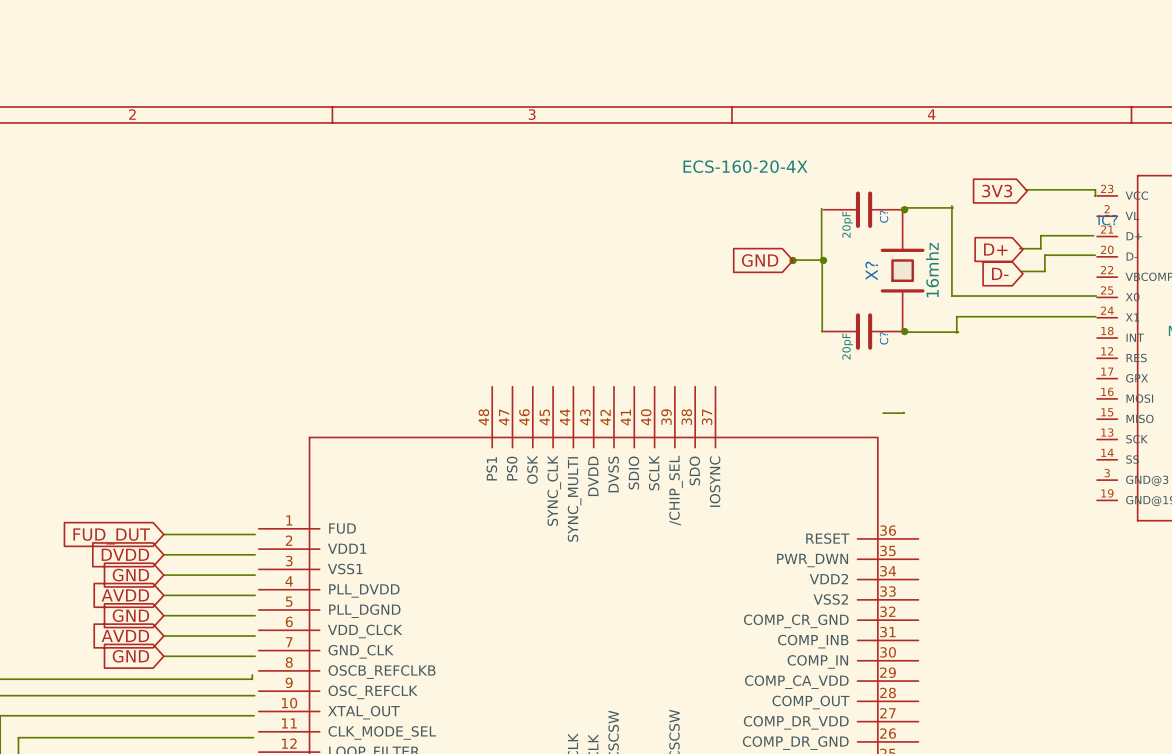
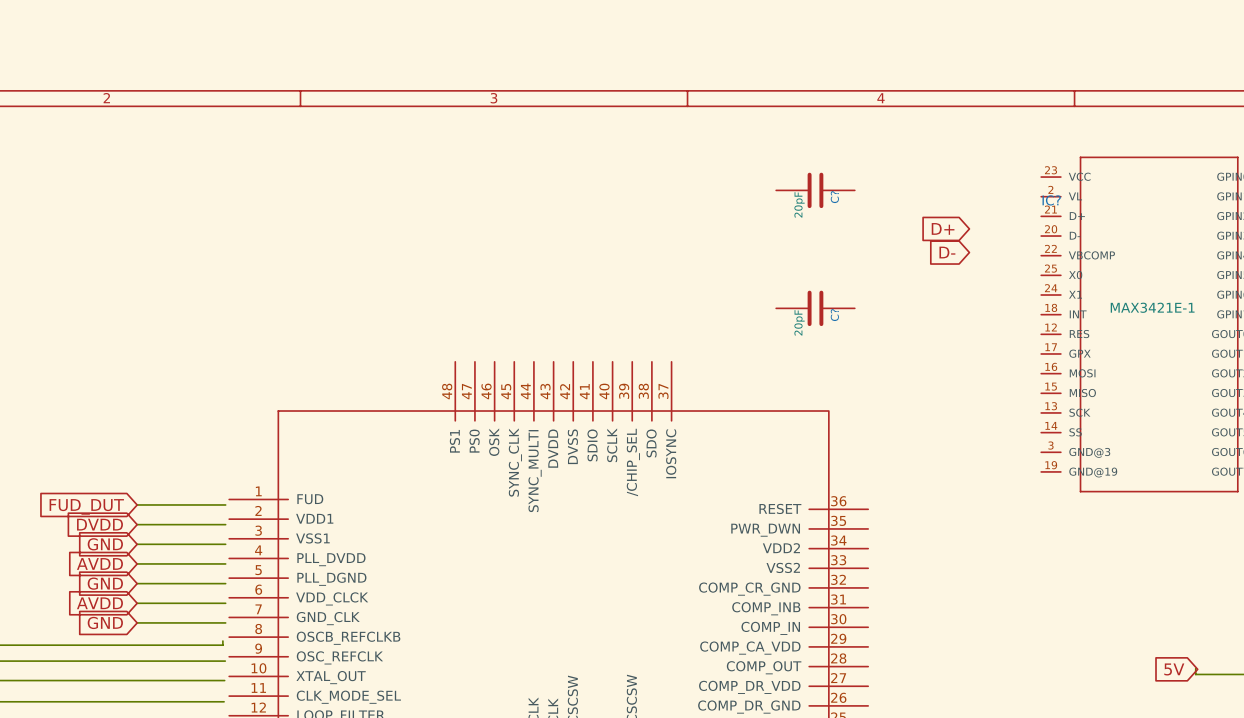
wire: (1025, 189) (1095, 189) (1094, 195) -> none
global label: 3V3 (997, 191) -> none
wire: (951, 205) (951, 296) (1096, 296) -> none
wire: (902, 207) (953, 207) -> none
wire: (821, 208) (821, 331) -> none
junction: (904, 209) -> none
wire: (1093, 235) (1040, 235) (1040, 248) (1019, 248) -> none
wire: (1095, 255) (1044, 255) (1044, 271) (1021, 271) -> none
wire: (821, 259) (790, 260) -> none
global label: GND (760, 260) -> none
junction: (793, 260) -> none
junction: (823, 260) -> none
X?: 16mhz (902, 270) -> none
wire: (1095, 316) (956, 316) (956, 333) -> none
junction: (904, 331) -> none
wire: (903, 332) (958, 332) -> none
wire: (903, 412) (883, 413) -> none

